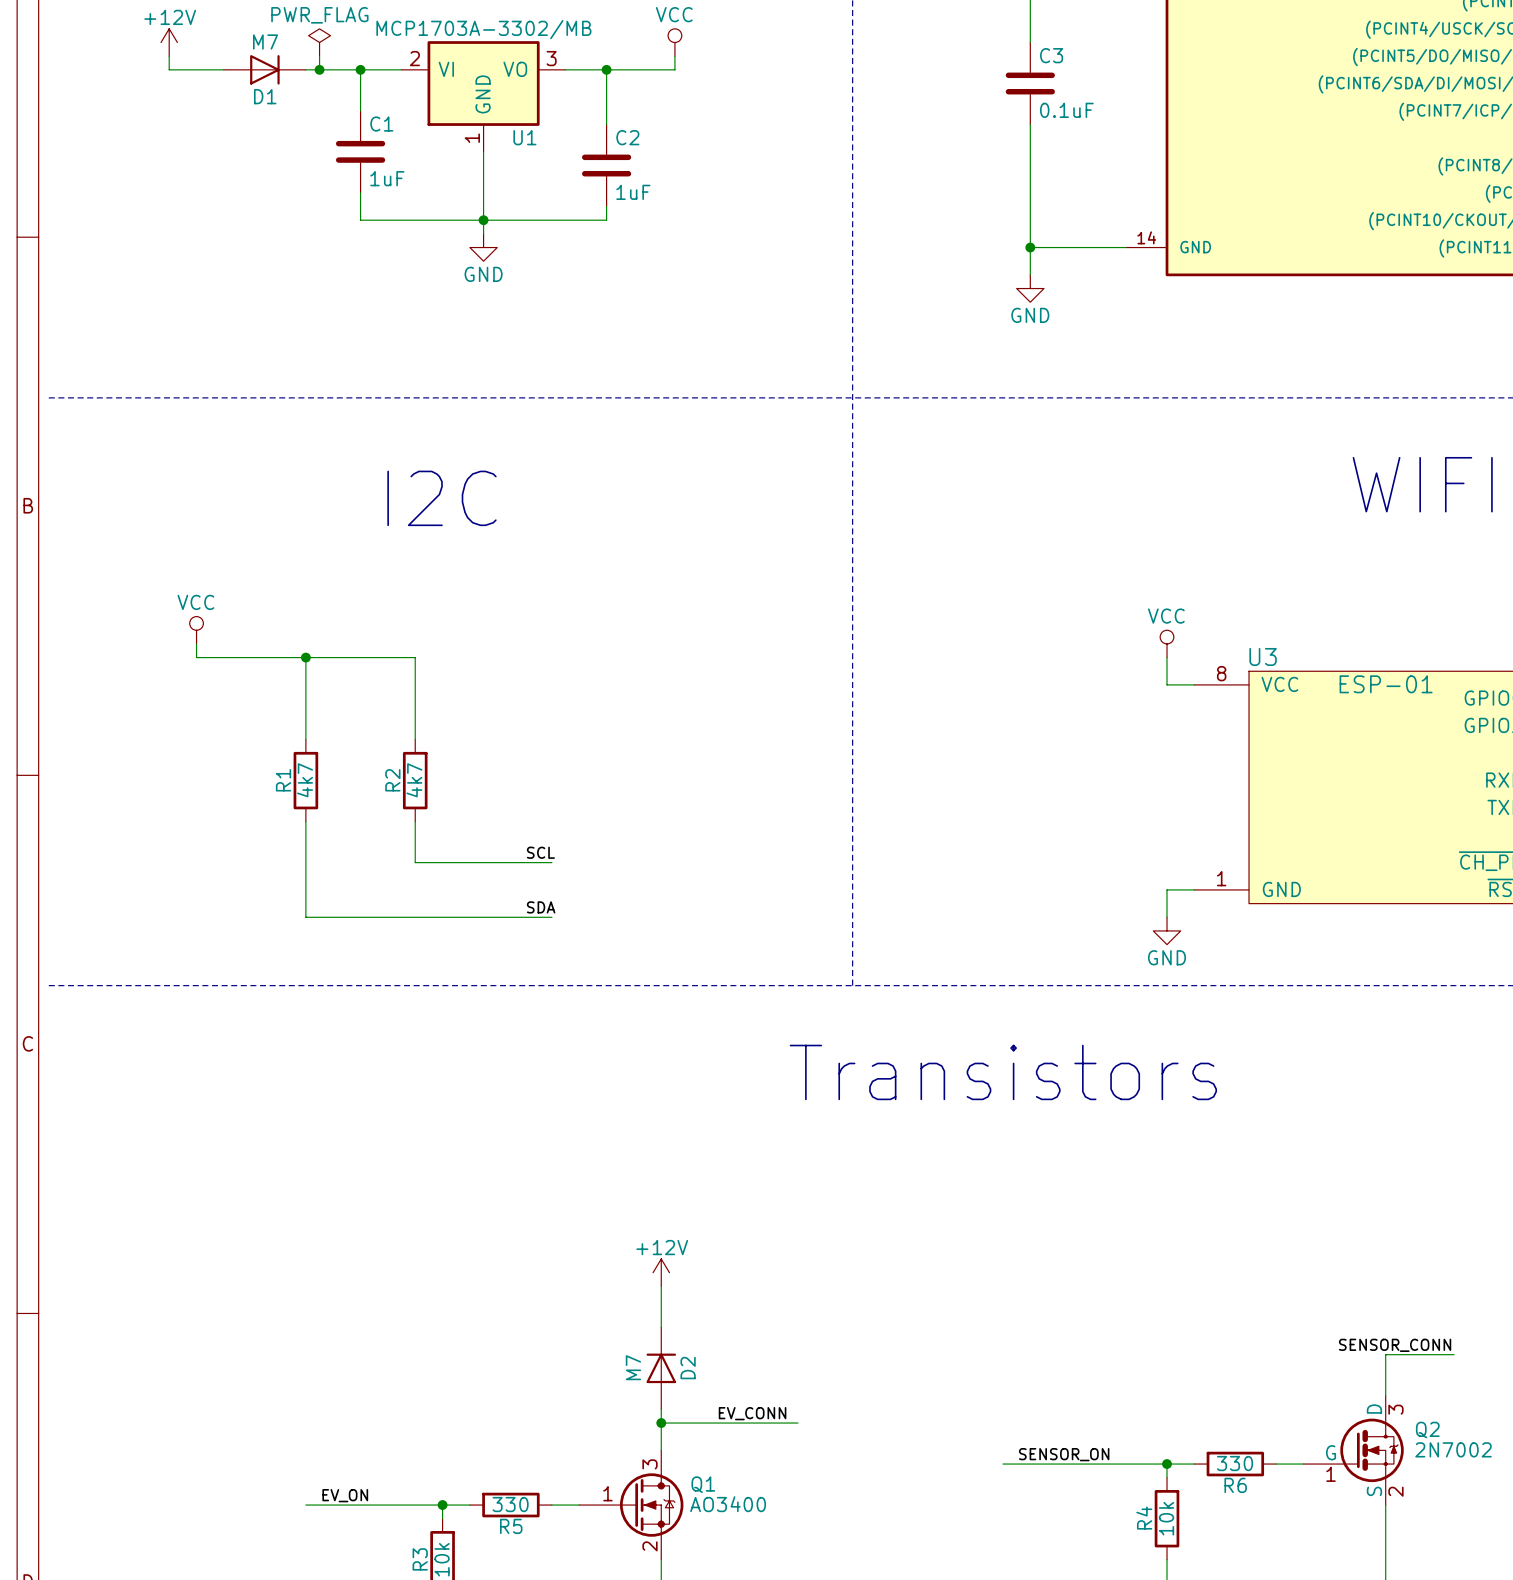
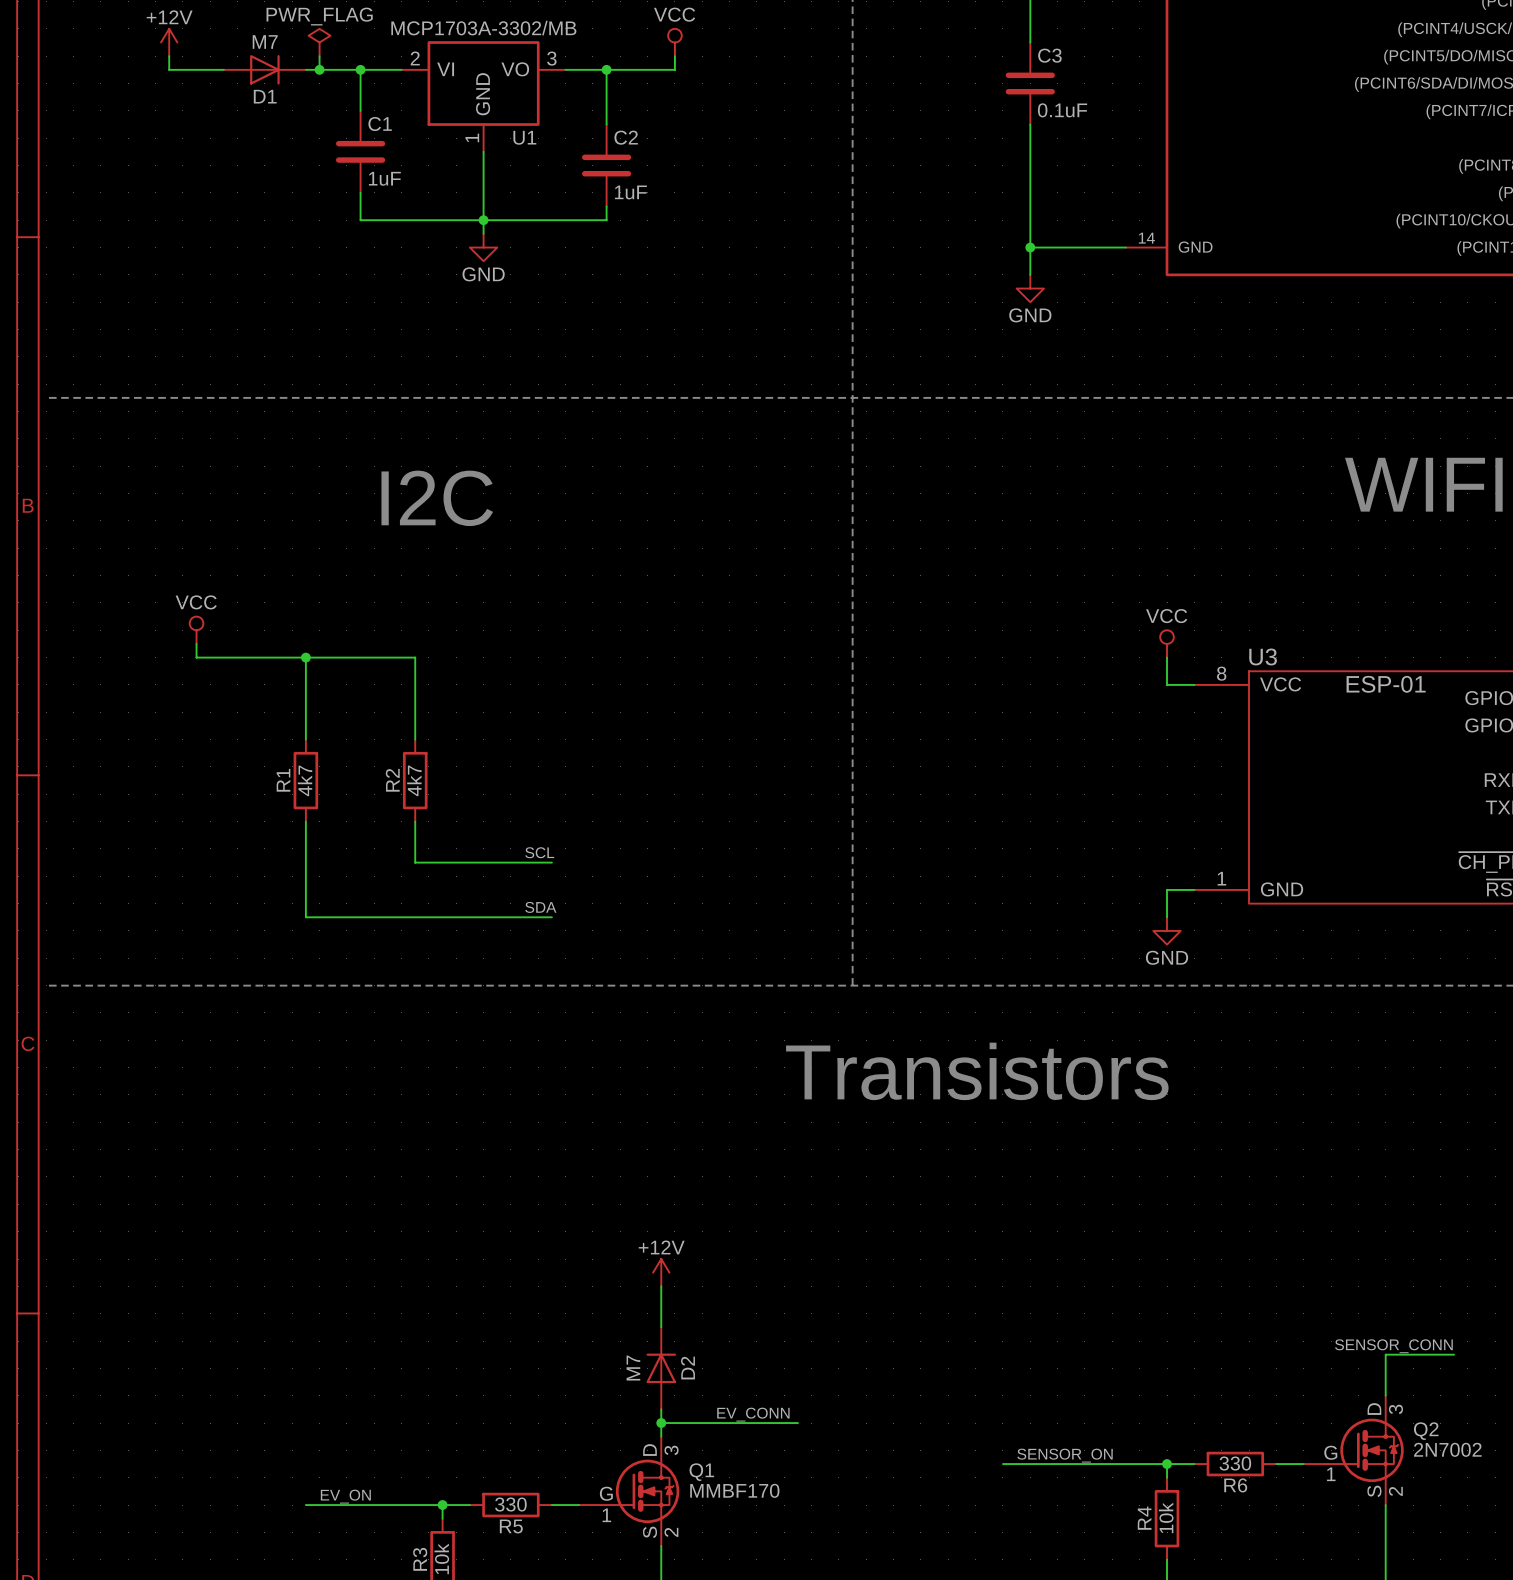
Q1 symbol: [579, 1450, 684, 1560] -> [579, 1436, 680, 1547]
Q1 value: AO3400 (728, 1504) -> MMBF170 (734, 1490)

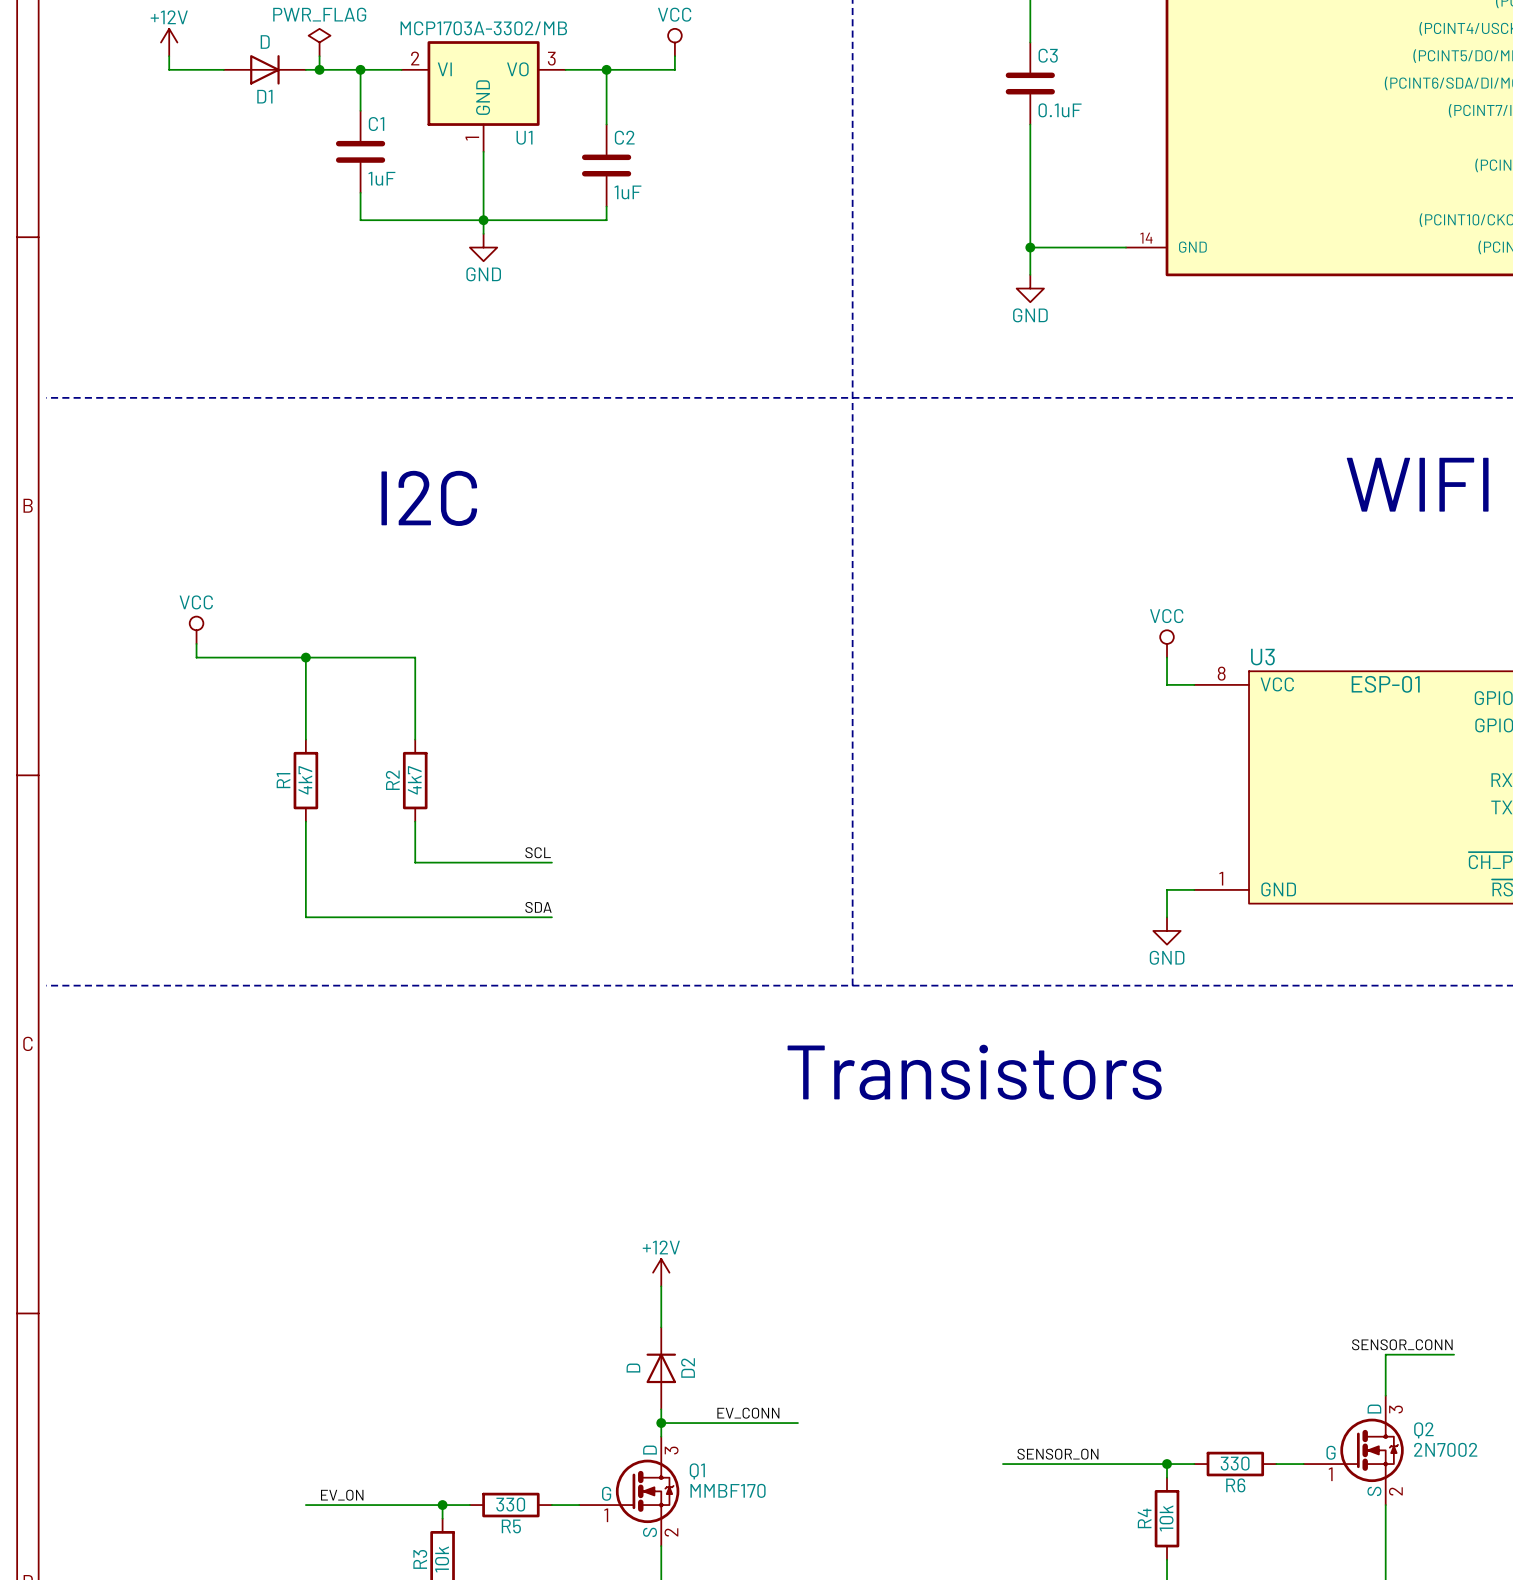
D1 value: M7 (265, 42) -> D (265, 42)
D2 value: M7 (633, 1368) -> D (633, 1368)

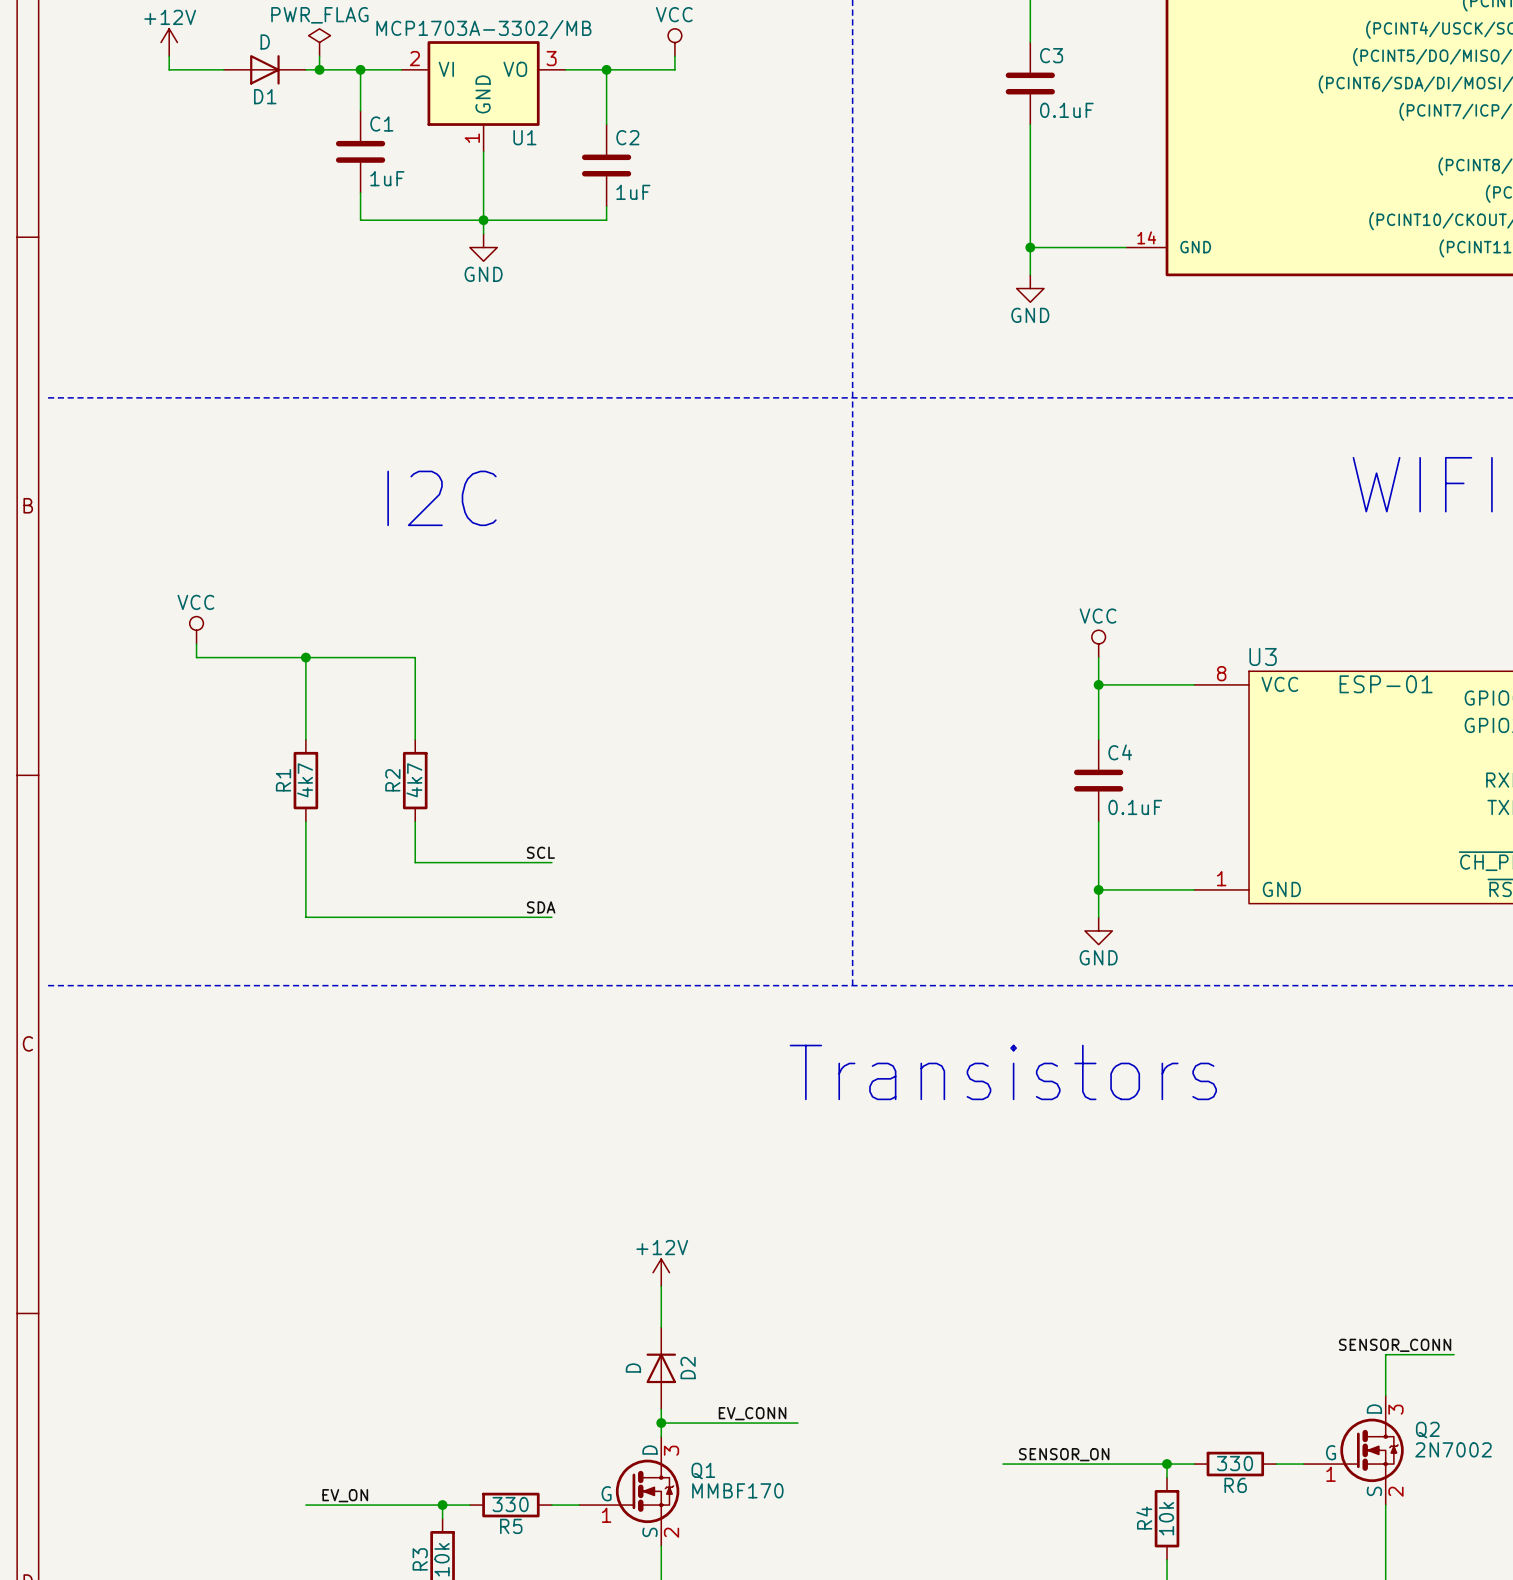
power symbol position: VCC (1167, 643) -> VCC (1098, 643)
wire: none -> (1098, 657) (1098, 739)
wire: (1167, 657) (1167, 684) -> (1098, 684) (1167, 684)
junction: none -> (1098, 684)
C4: none -> 0.1uF (1098, 780)
wire: none -> (1098, 821) (1098, 917)
junction: none -> (1098, 889)
wire: (1167, 889) (1167, 917) -> (1167, 889) (1098, 889)
power symbol position: GND (1167, 930) -> GND (1098, 930)

